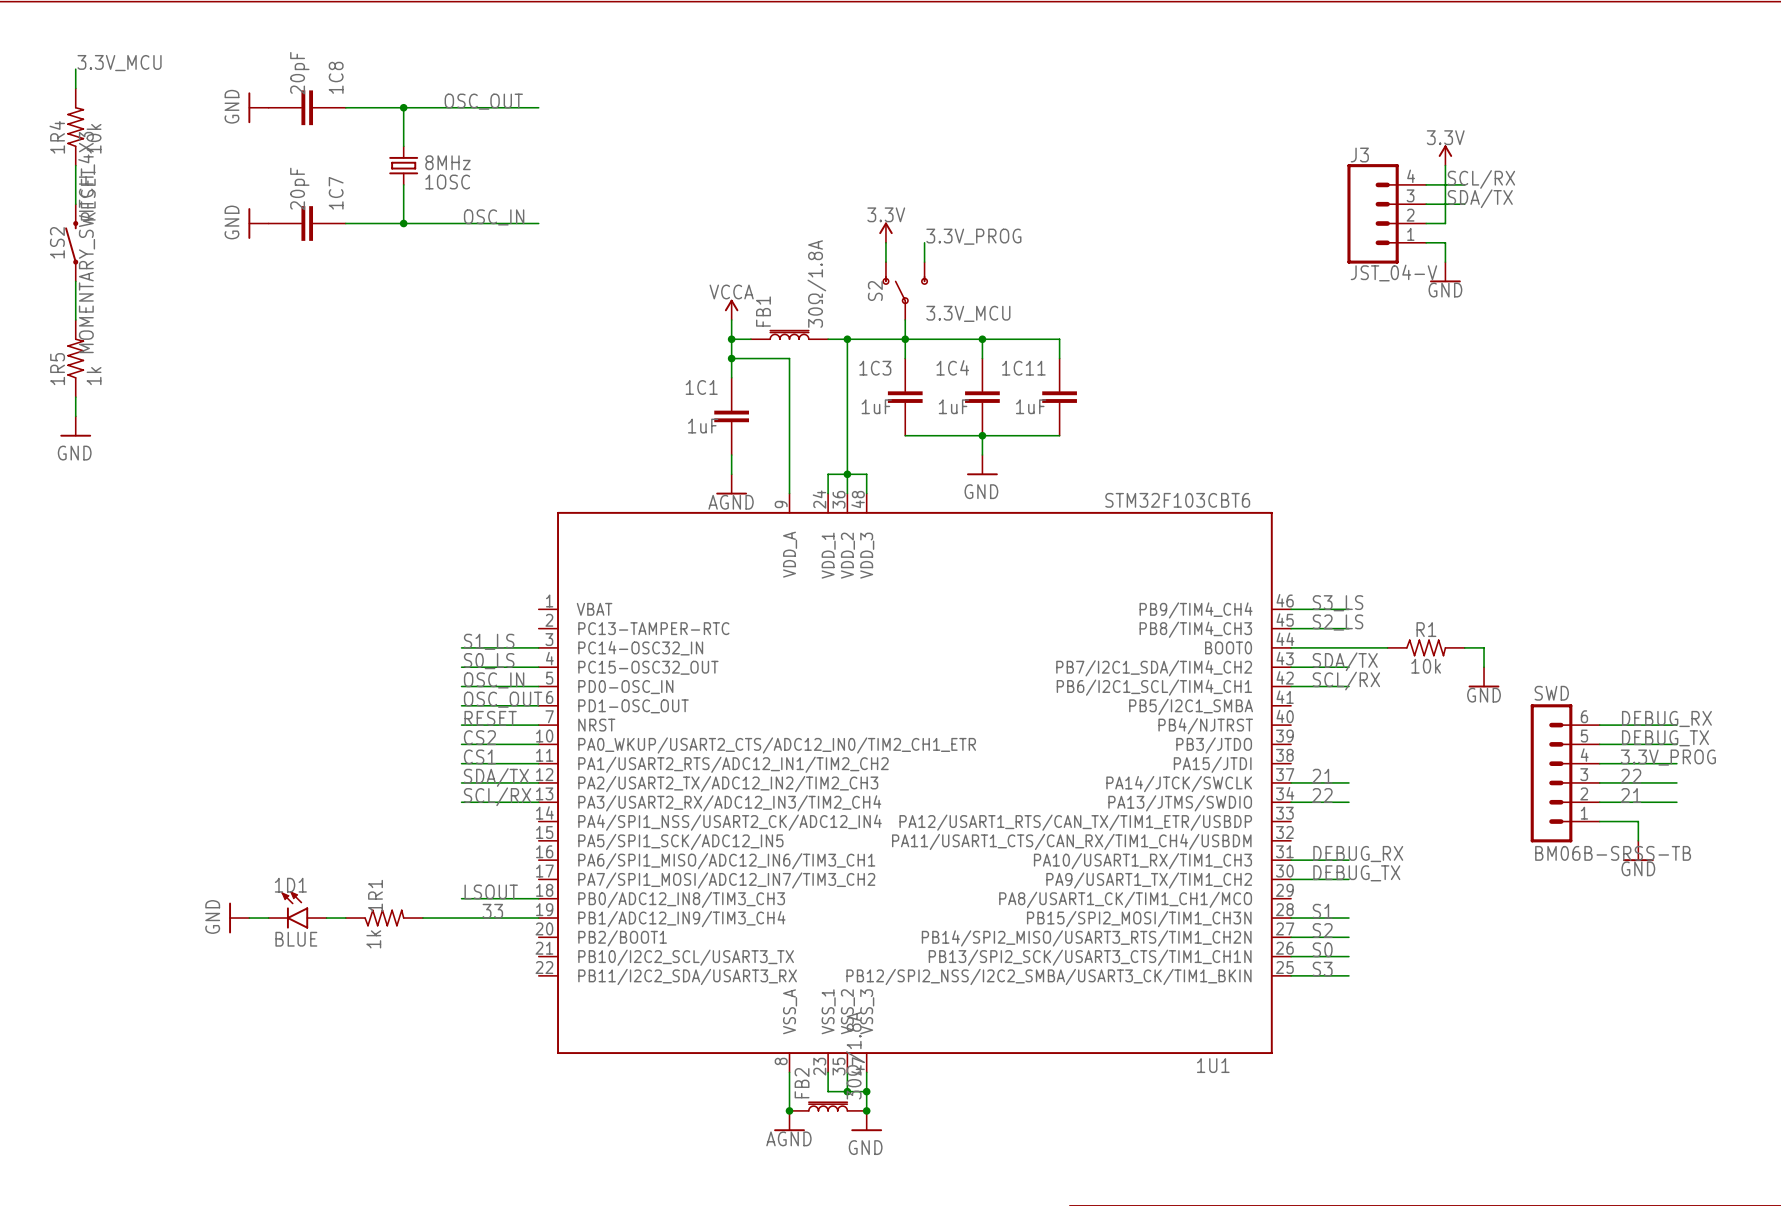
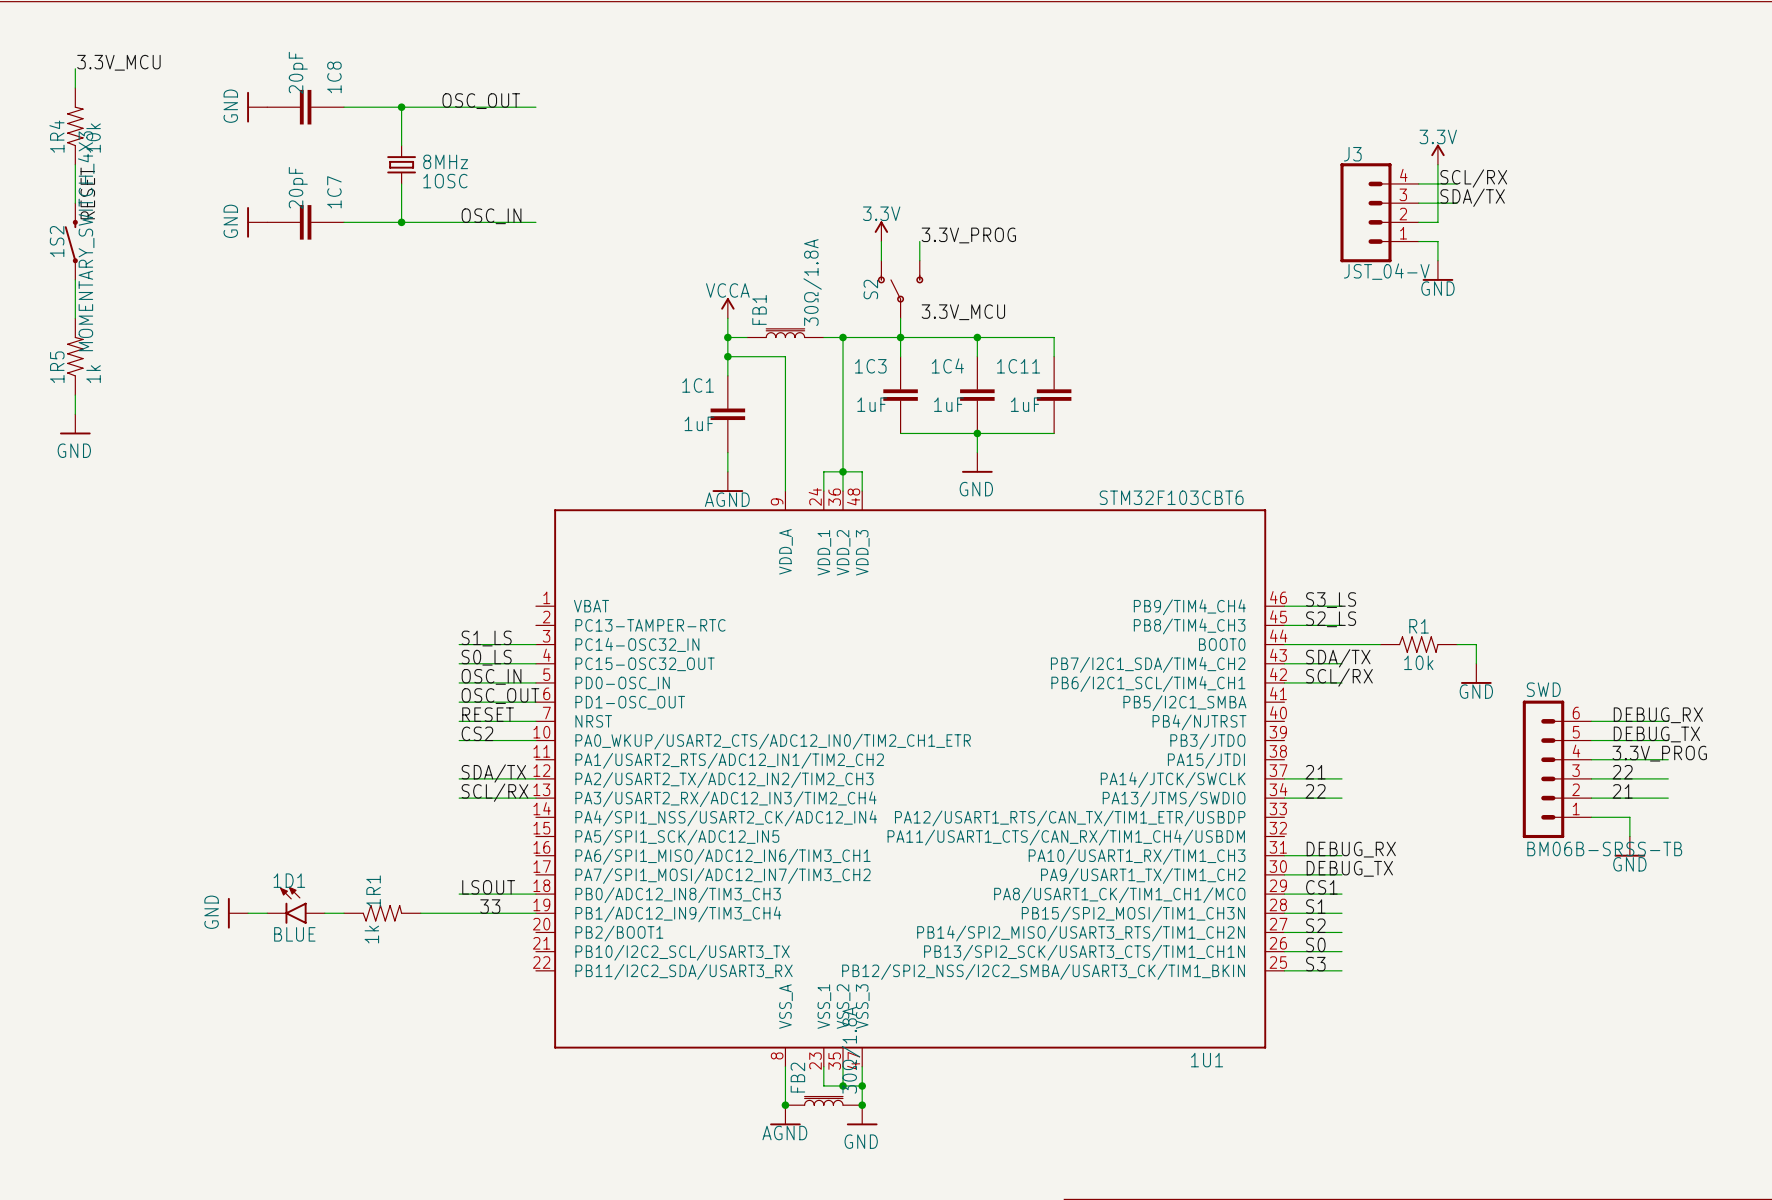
label: CS1 (479, 756) -> none
wire: (461, 763) (538, 763) -> none
label: none -> CS1 (1321, 887)
wire: none -> (1284, 894) (1342, 894)

